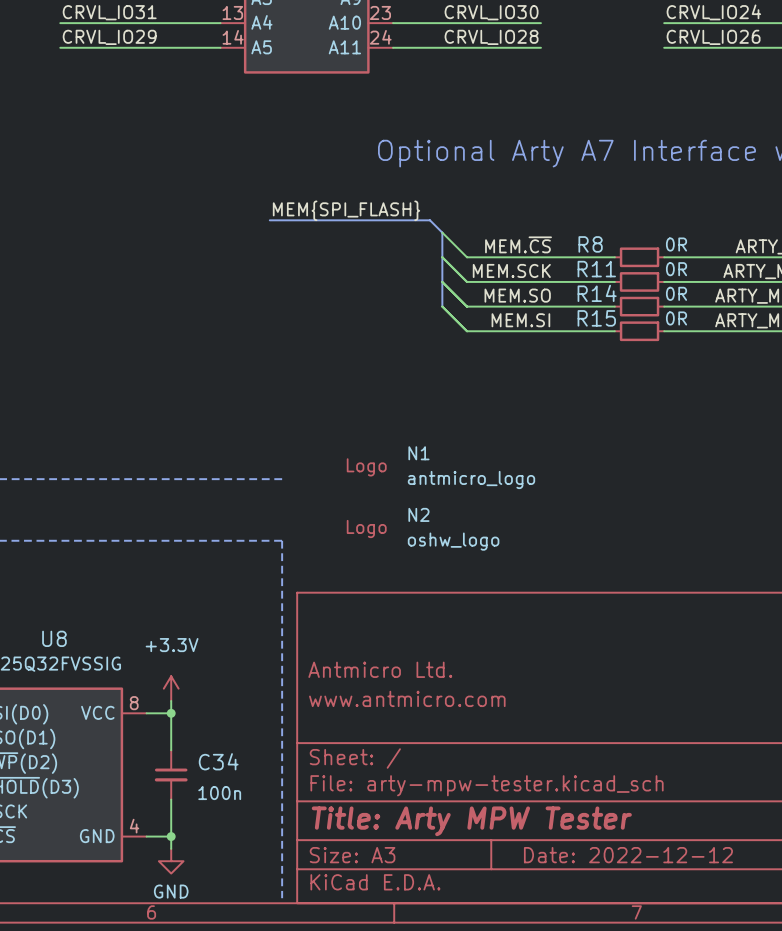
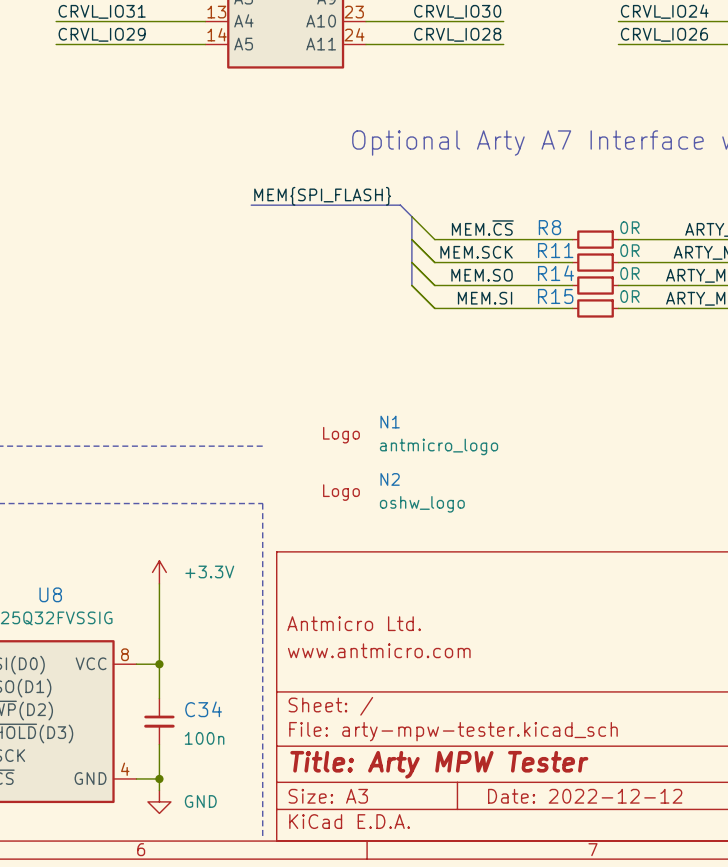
wire: none -> (159, 583) (159, 652)
power symbol text position: +3.3V (172, 645) -> +3.3V (209, 571)
power symbol position: +3.3V (171, 688) -> +3.3V (159, 572)
power symbol text position: GND (171, 891) -> GND (200, 801)

